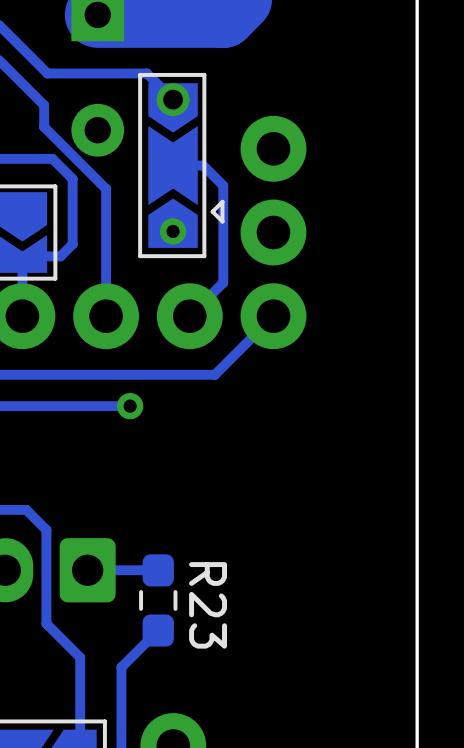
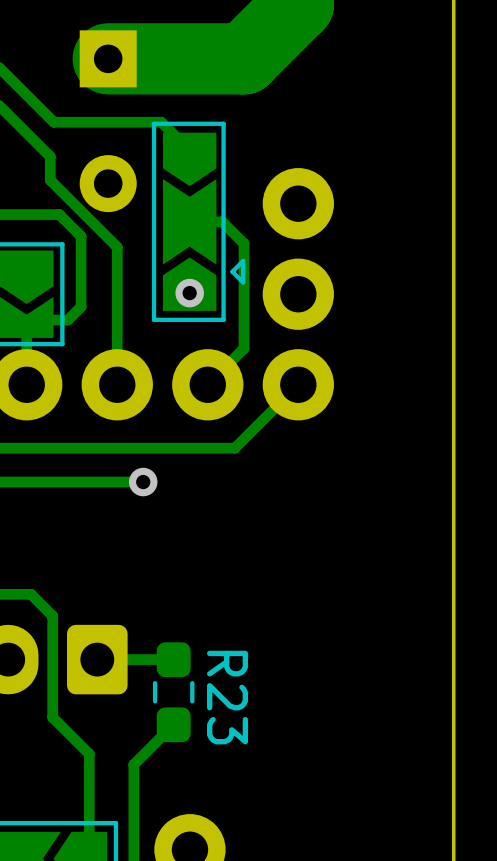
via: (173, 99) -> none

